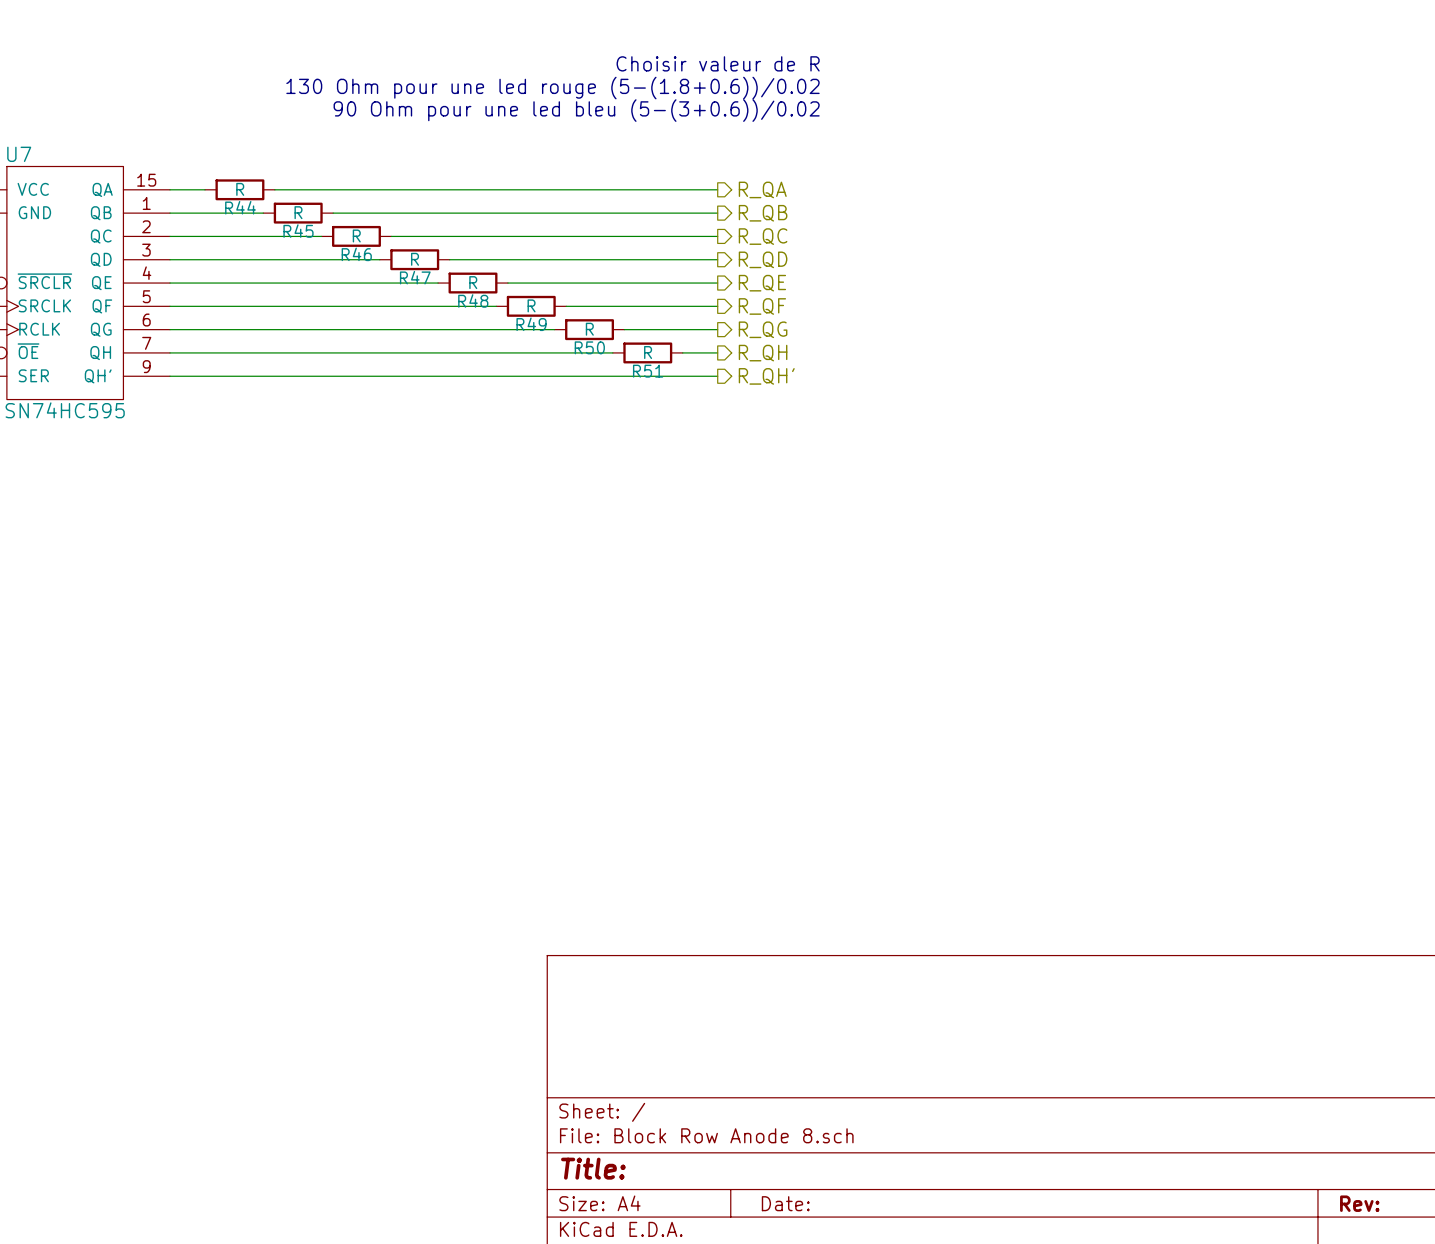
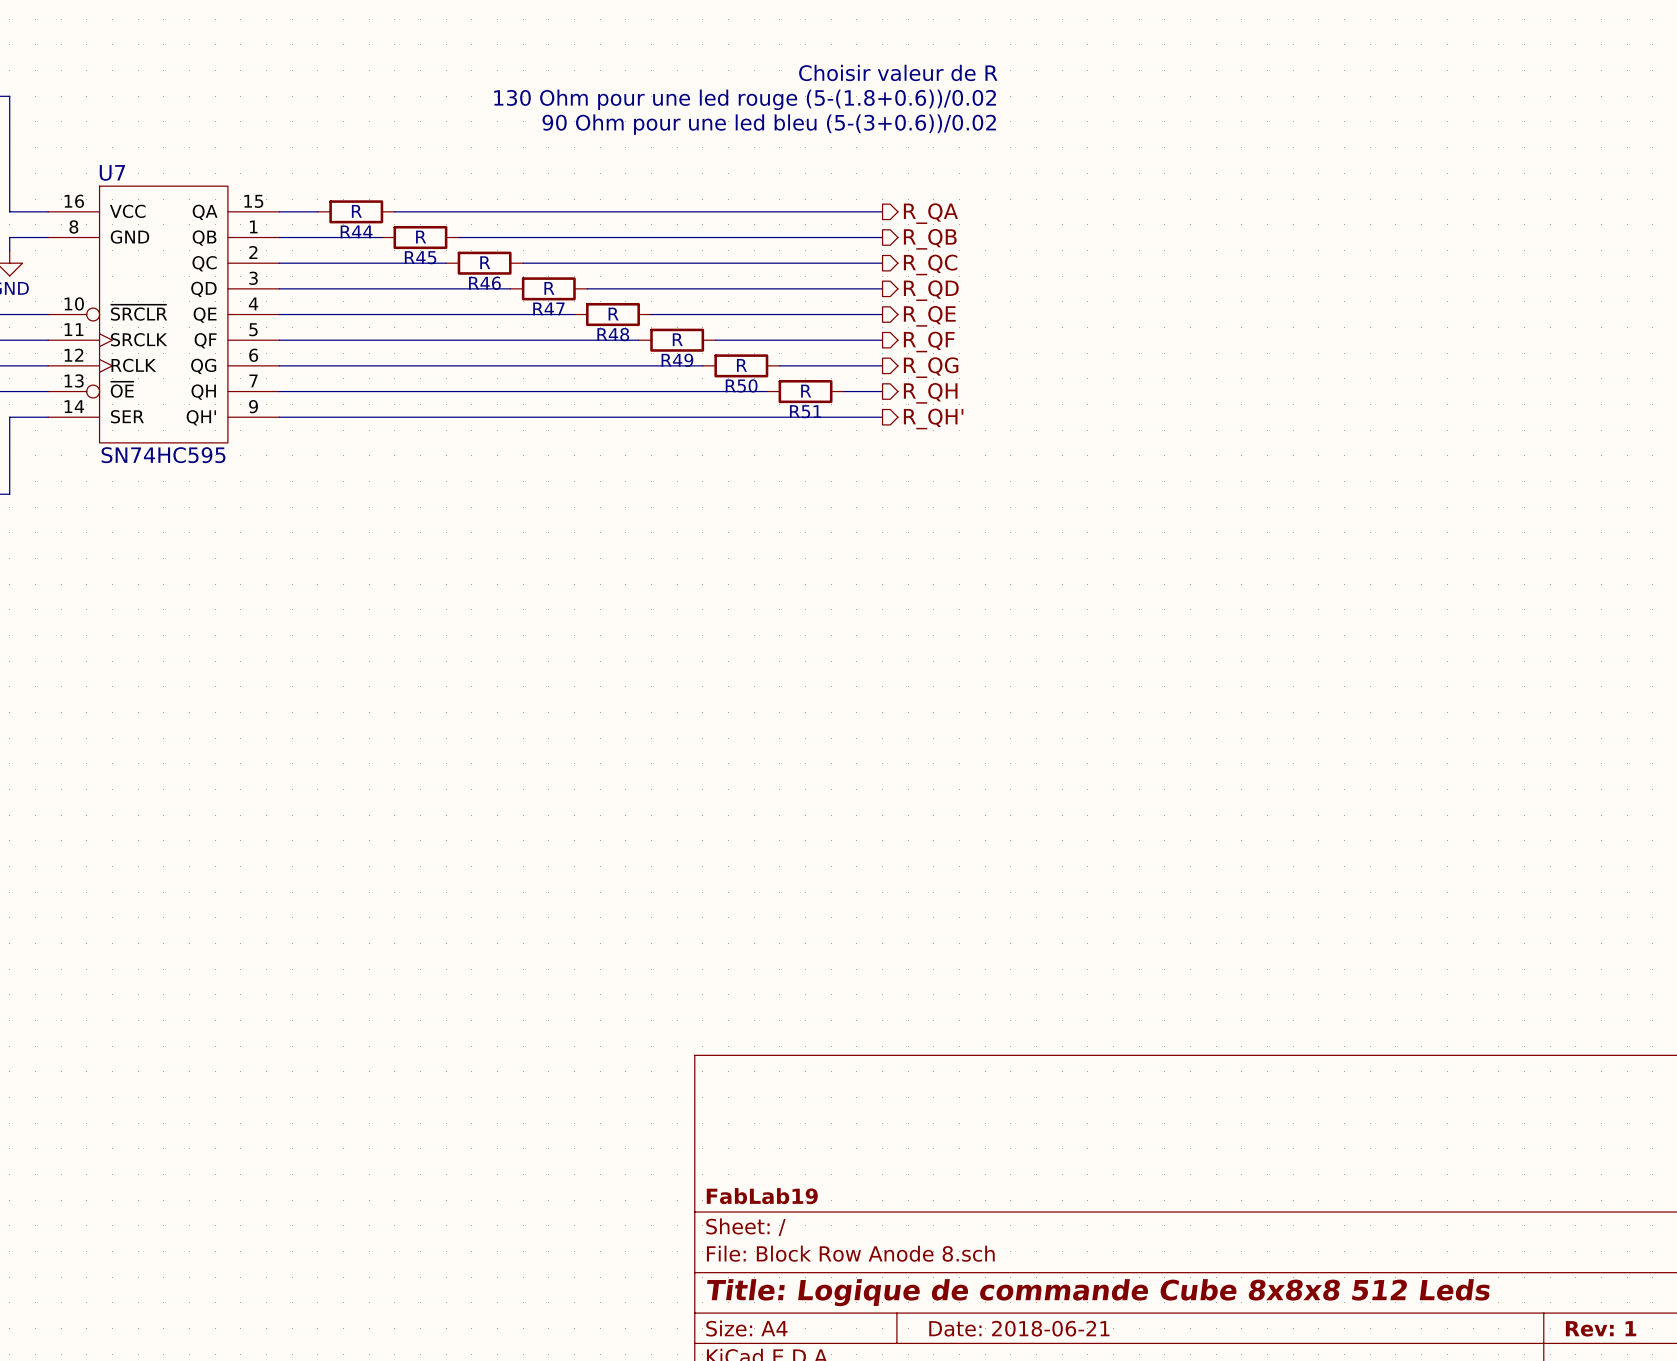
title block: none -> FabLab19 (762, 1196)
title block: Title: (593, 1168) -> Title: Logique de commande Cube 8x8x8 512 Leds (1098, 1292)
title block: Date: (785, 1203) -> Date: 2018-06-21 (1019, 1328)
title block: Rev: (1359, 1203) -> Rev: 1 (1601, 1328)

